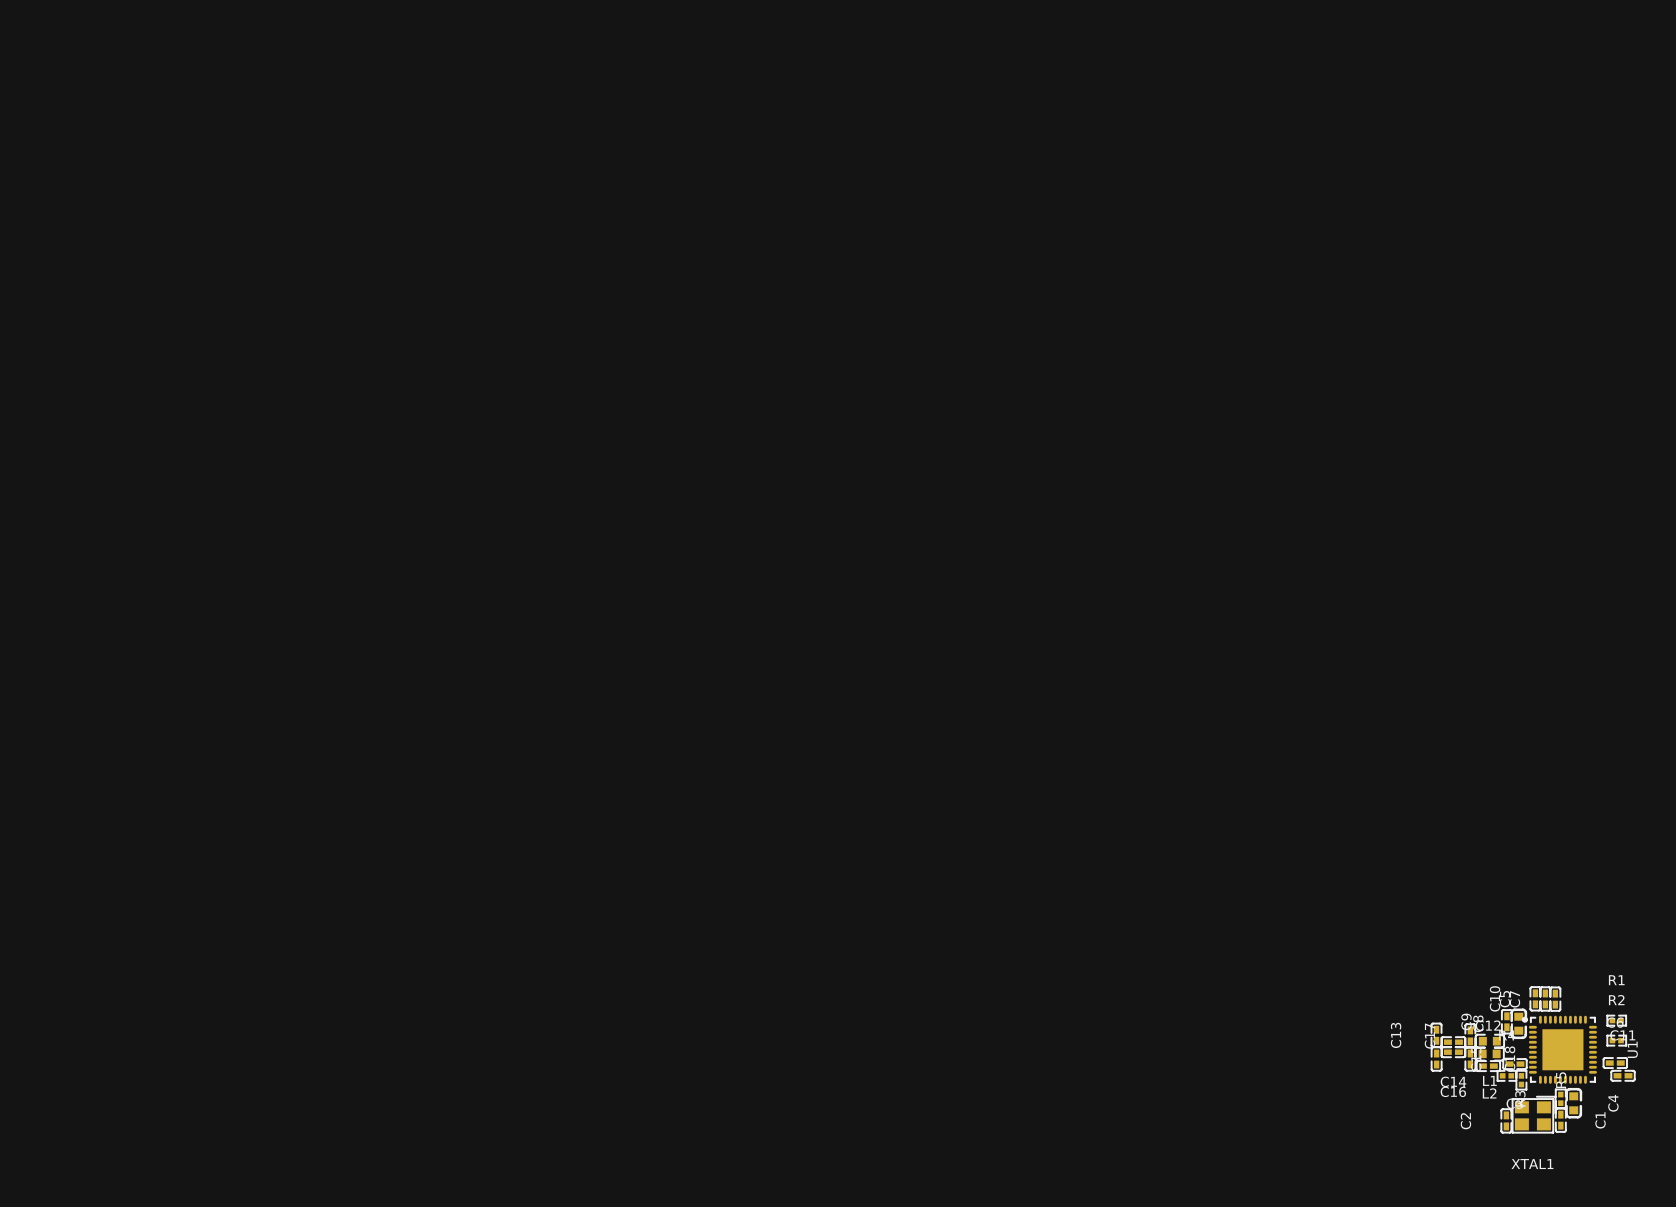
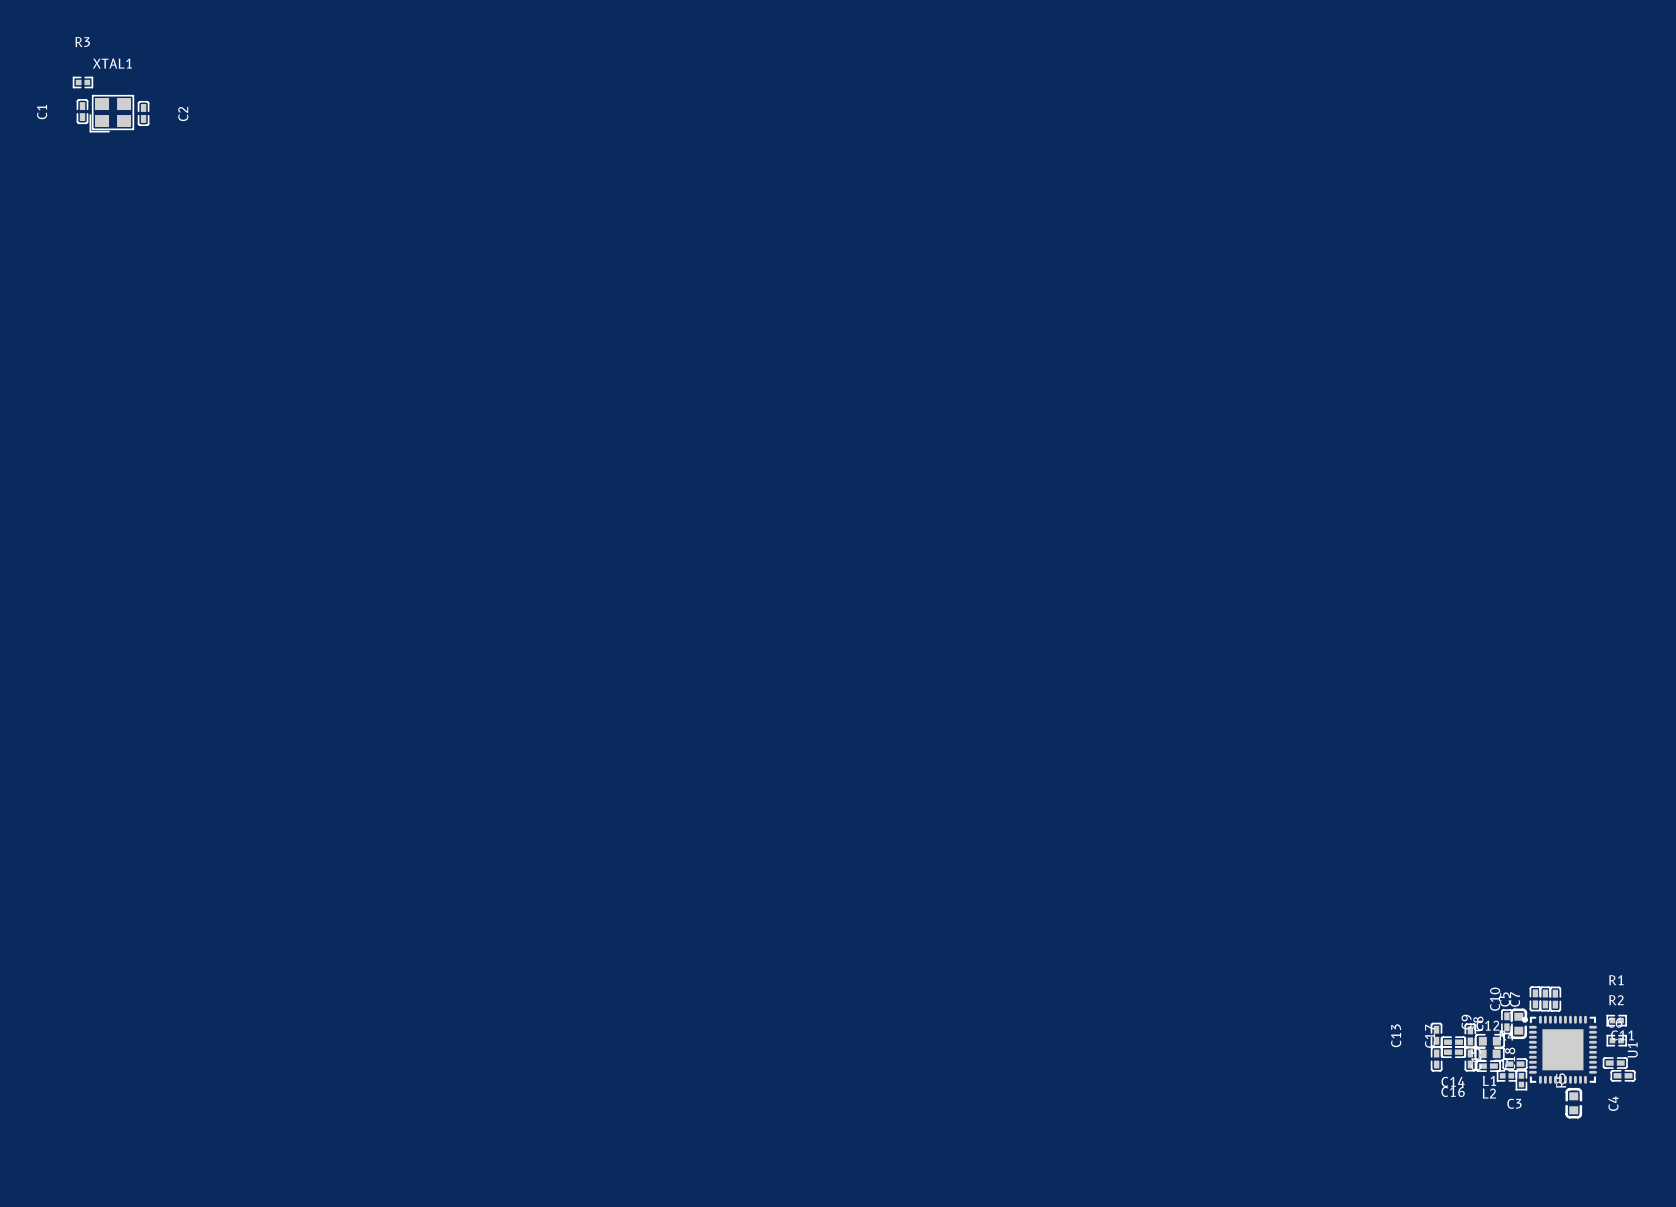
R3 rotation: 0° (1560, 1098) -> 90° clockwise (82, 82)
R3 position: (1560, 1098) -> (82, 82)
XTAL1 rotation: 0° (1534, 1114) -> 180° (111, 113)
XTAL1 position: (1534, 1114) -> (111, 113)
C2 position: (1506, 1120) -> (143, 113)
C1 position: (1560, 1120) -> (82, 111)
C1 name position: C1 (1600, 1120) -> C1 (42, 112)
C2 name position: C2 (1465, 1121) -> C2 (183, 113)

